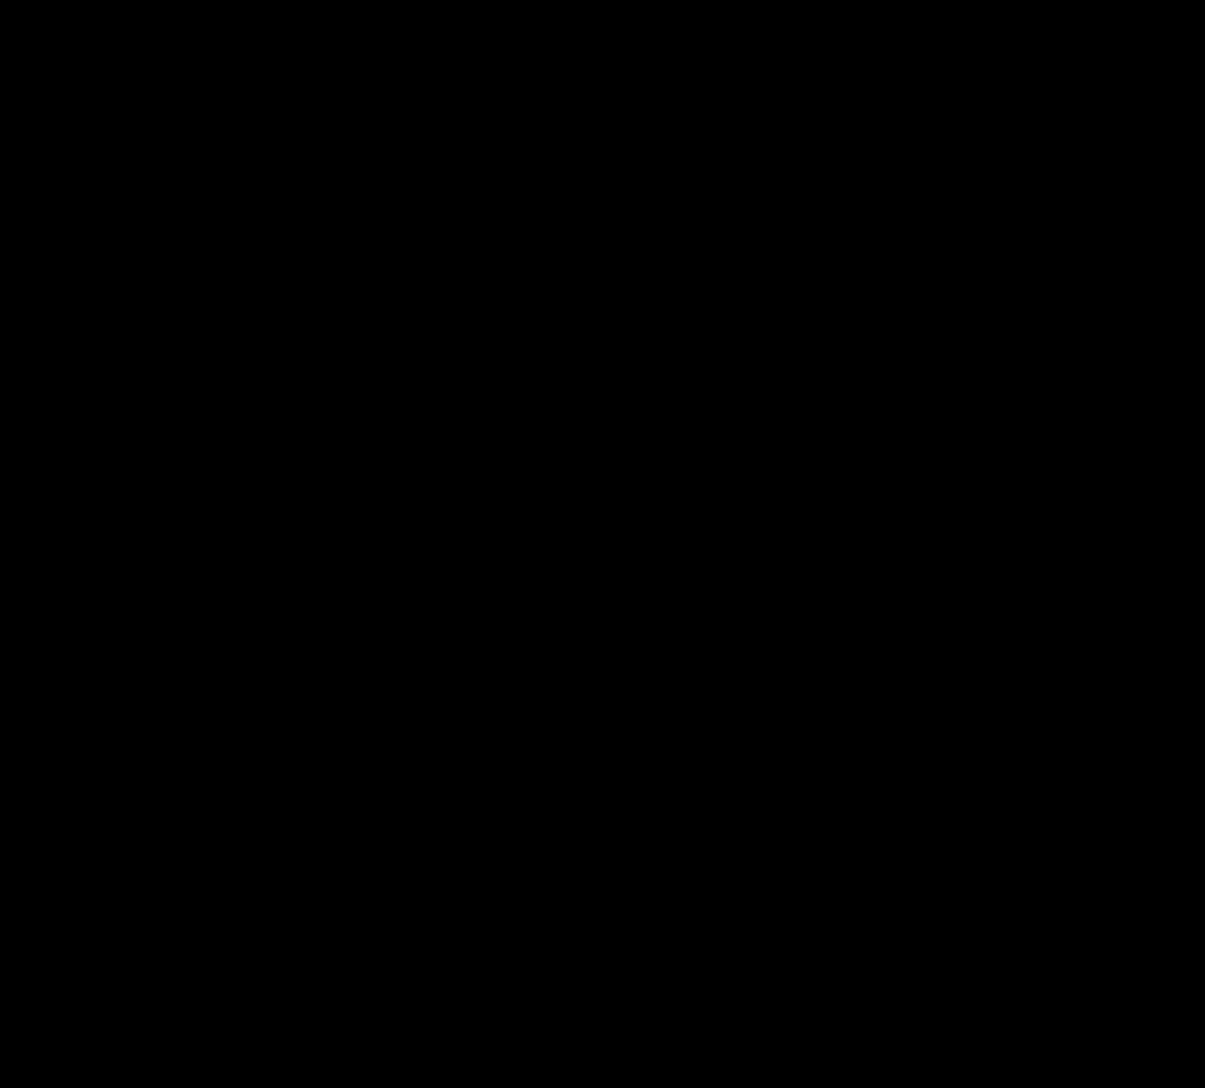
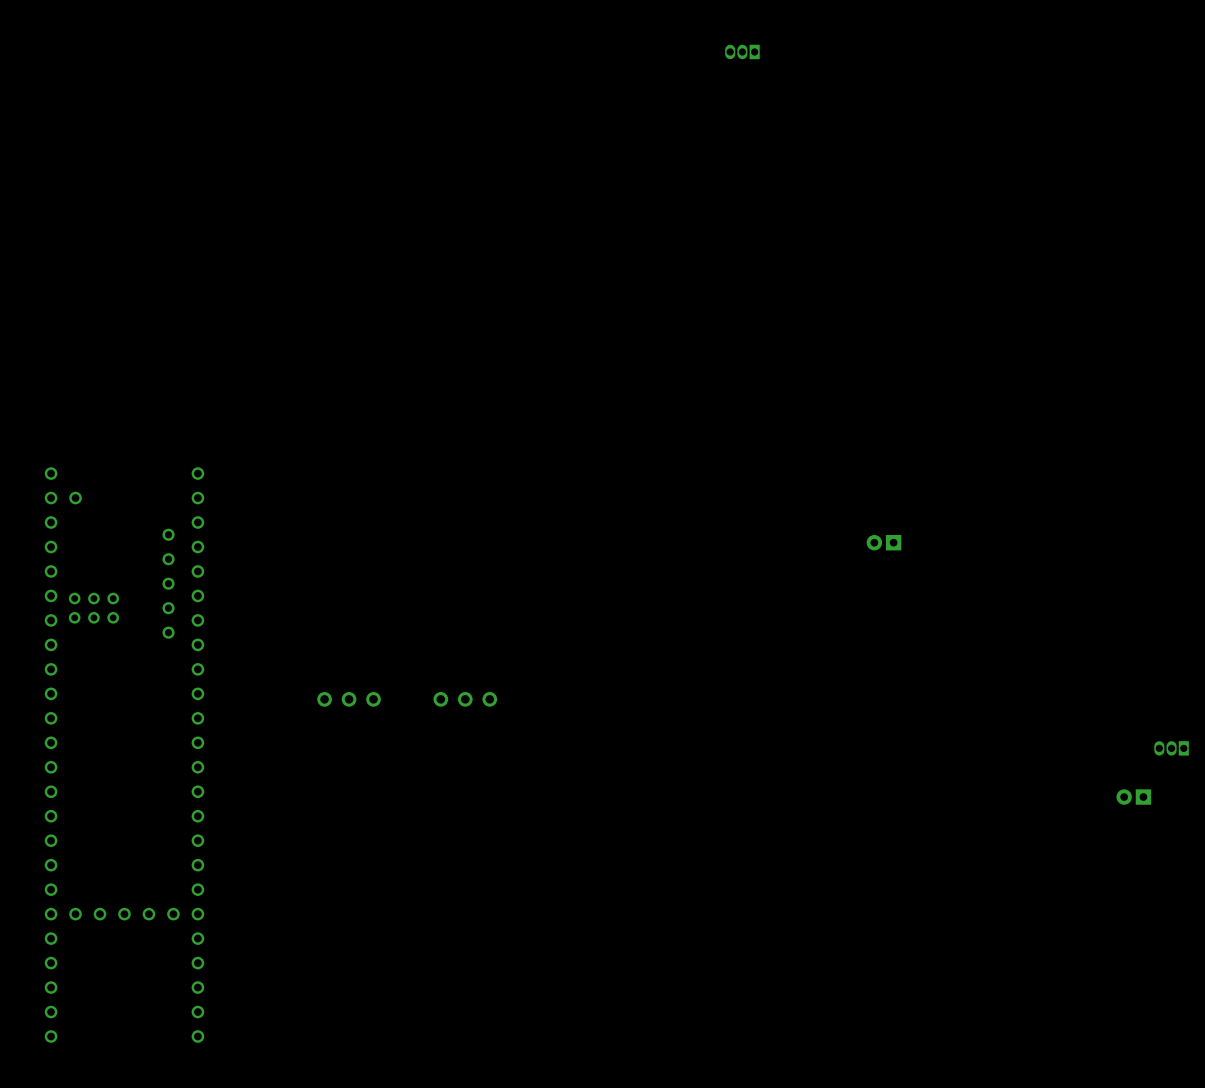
part: none -> (742, 51)
part: none -> (883, 542)
part: none -> (349, 699)
part: none -> (465, 699)
part: none -> (1171, 748)
part: none -> (124, 755)
part: none -> (1133, 797)

